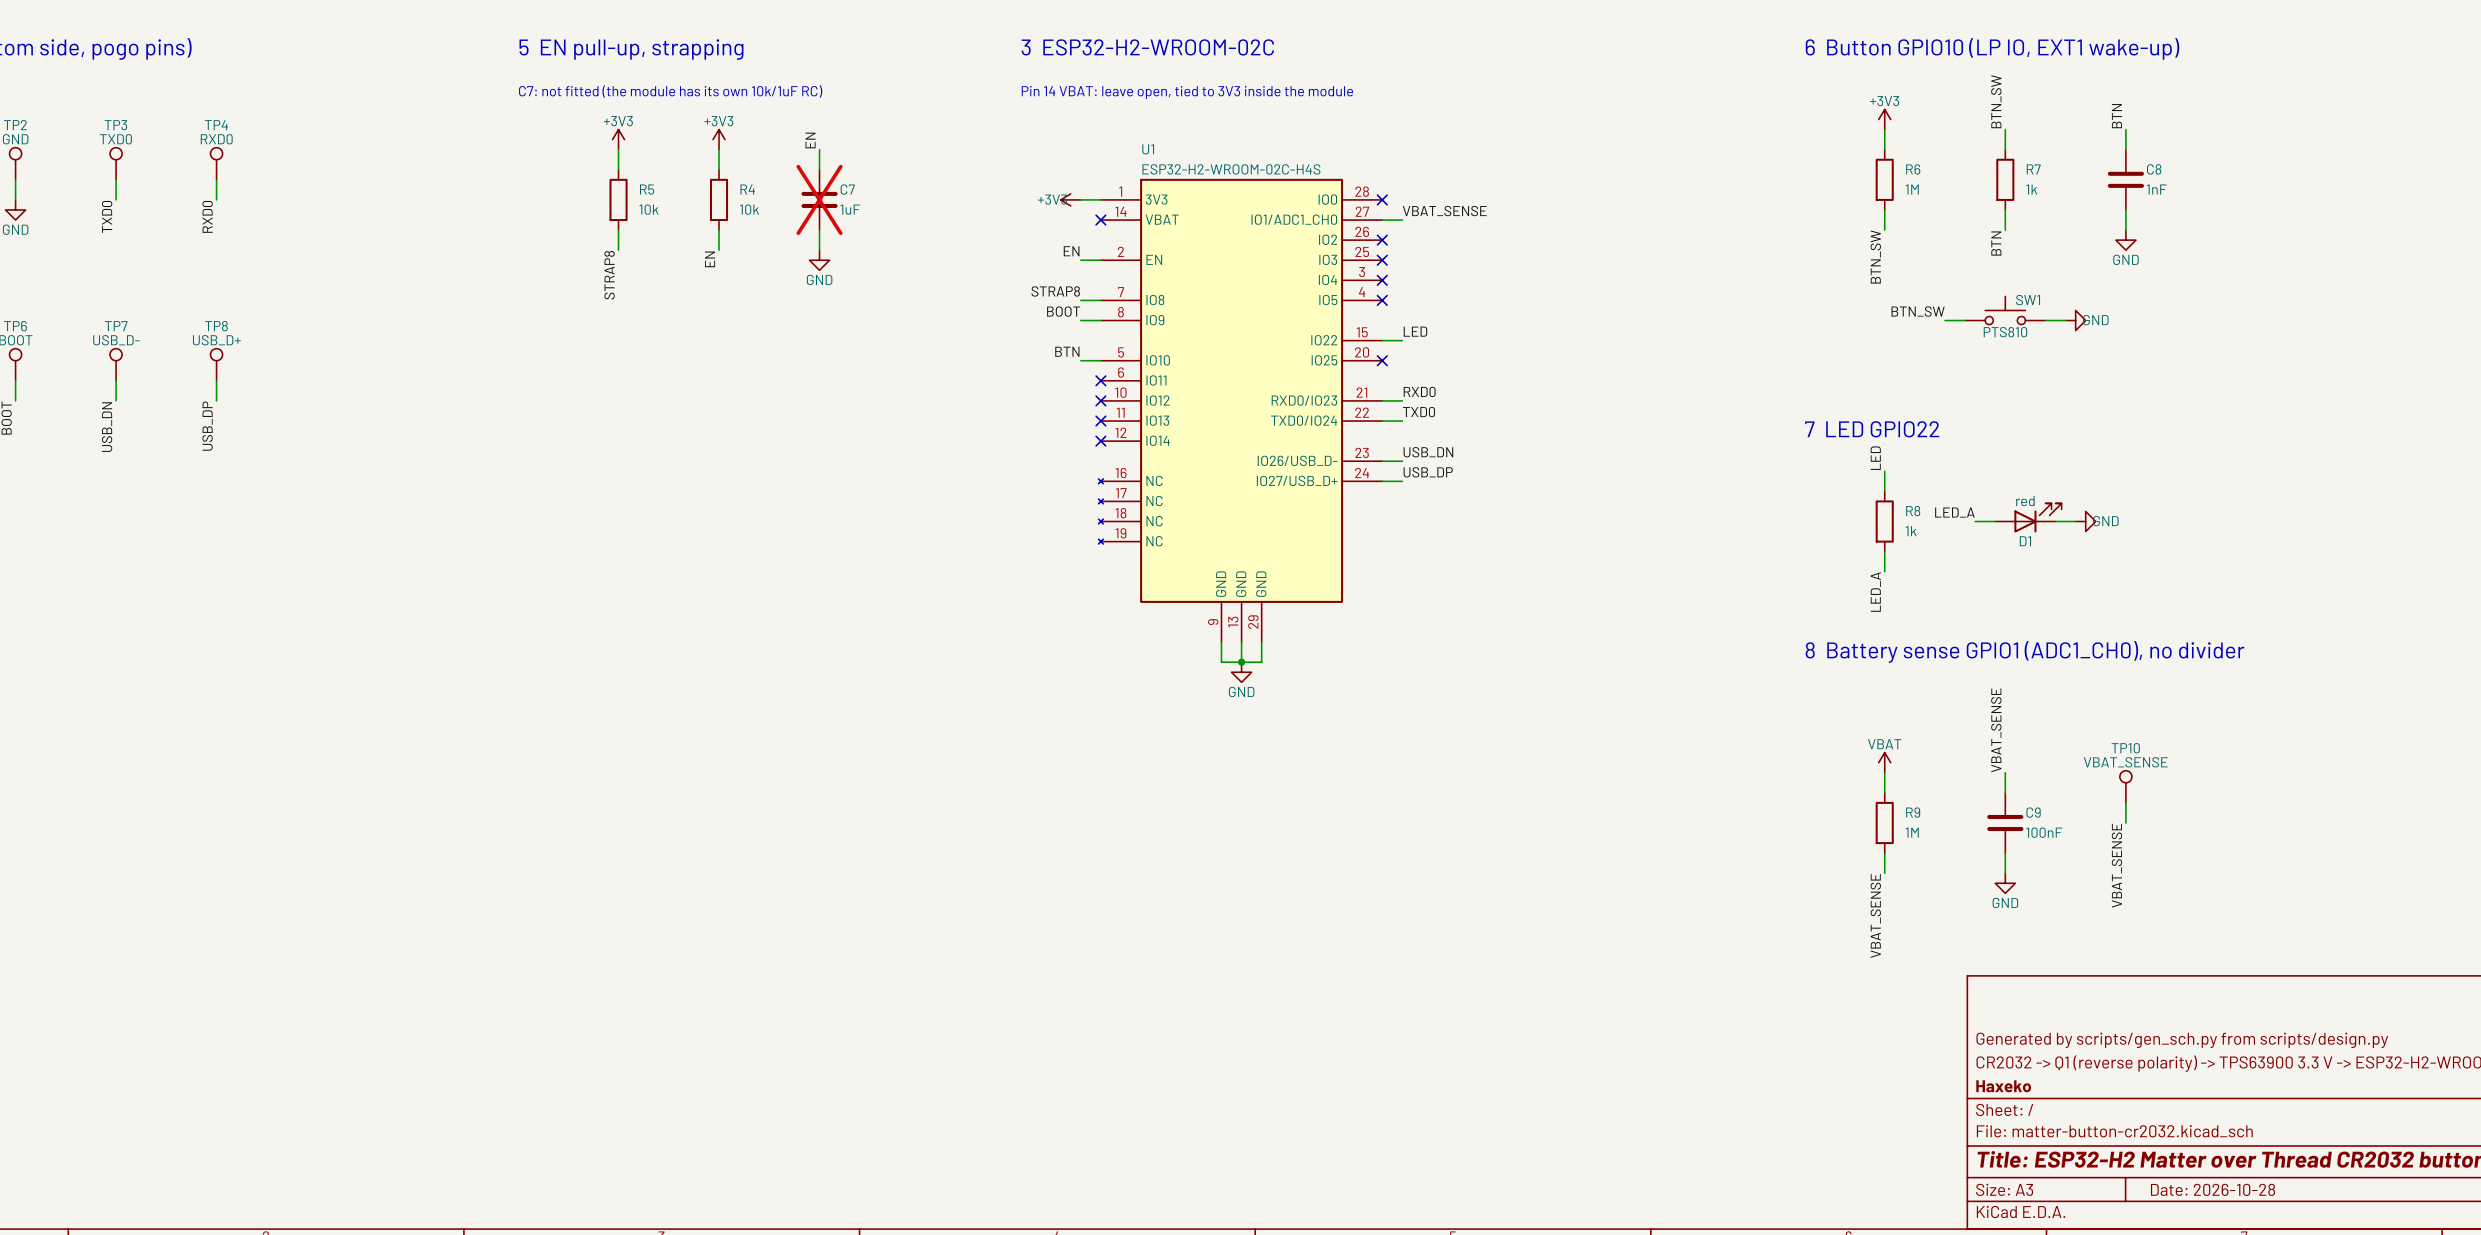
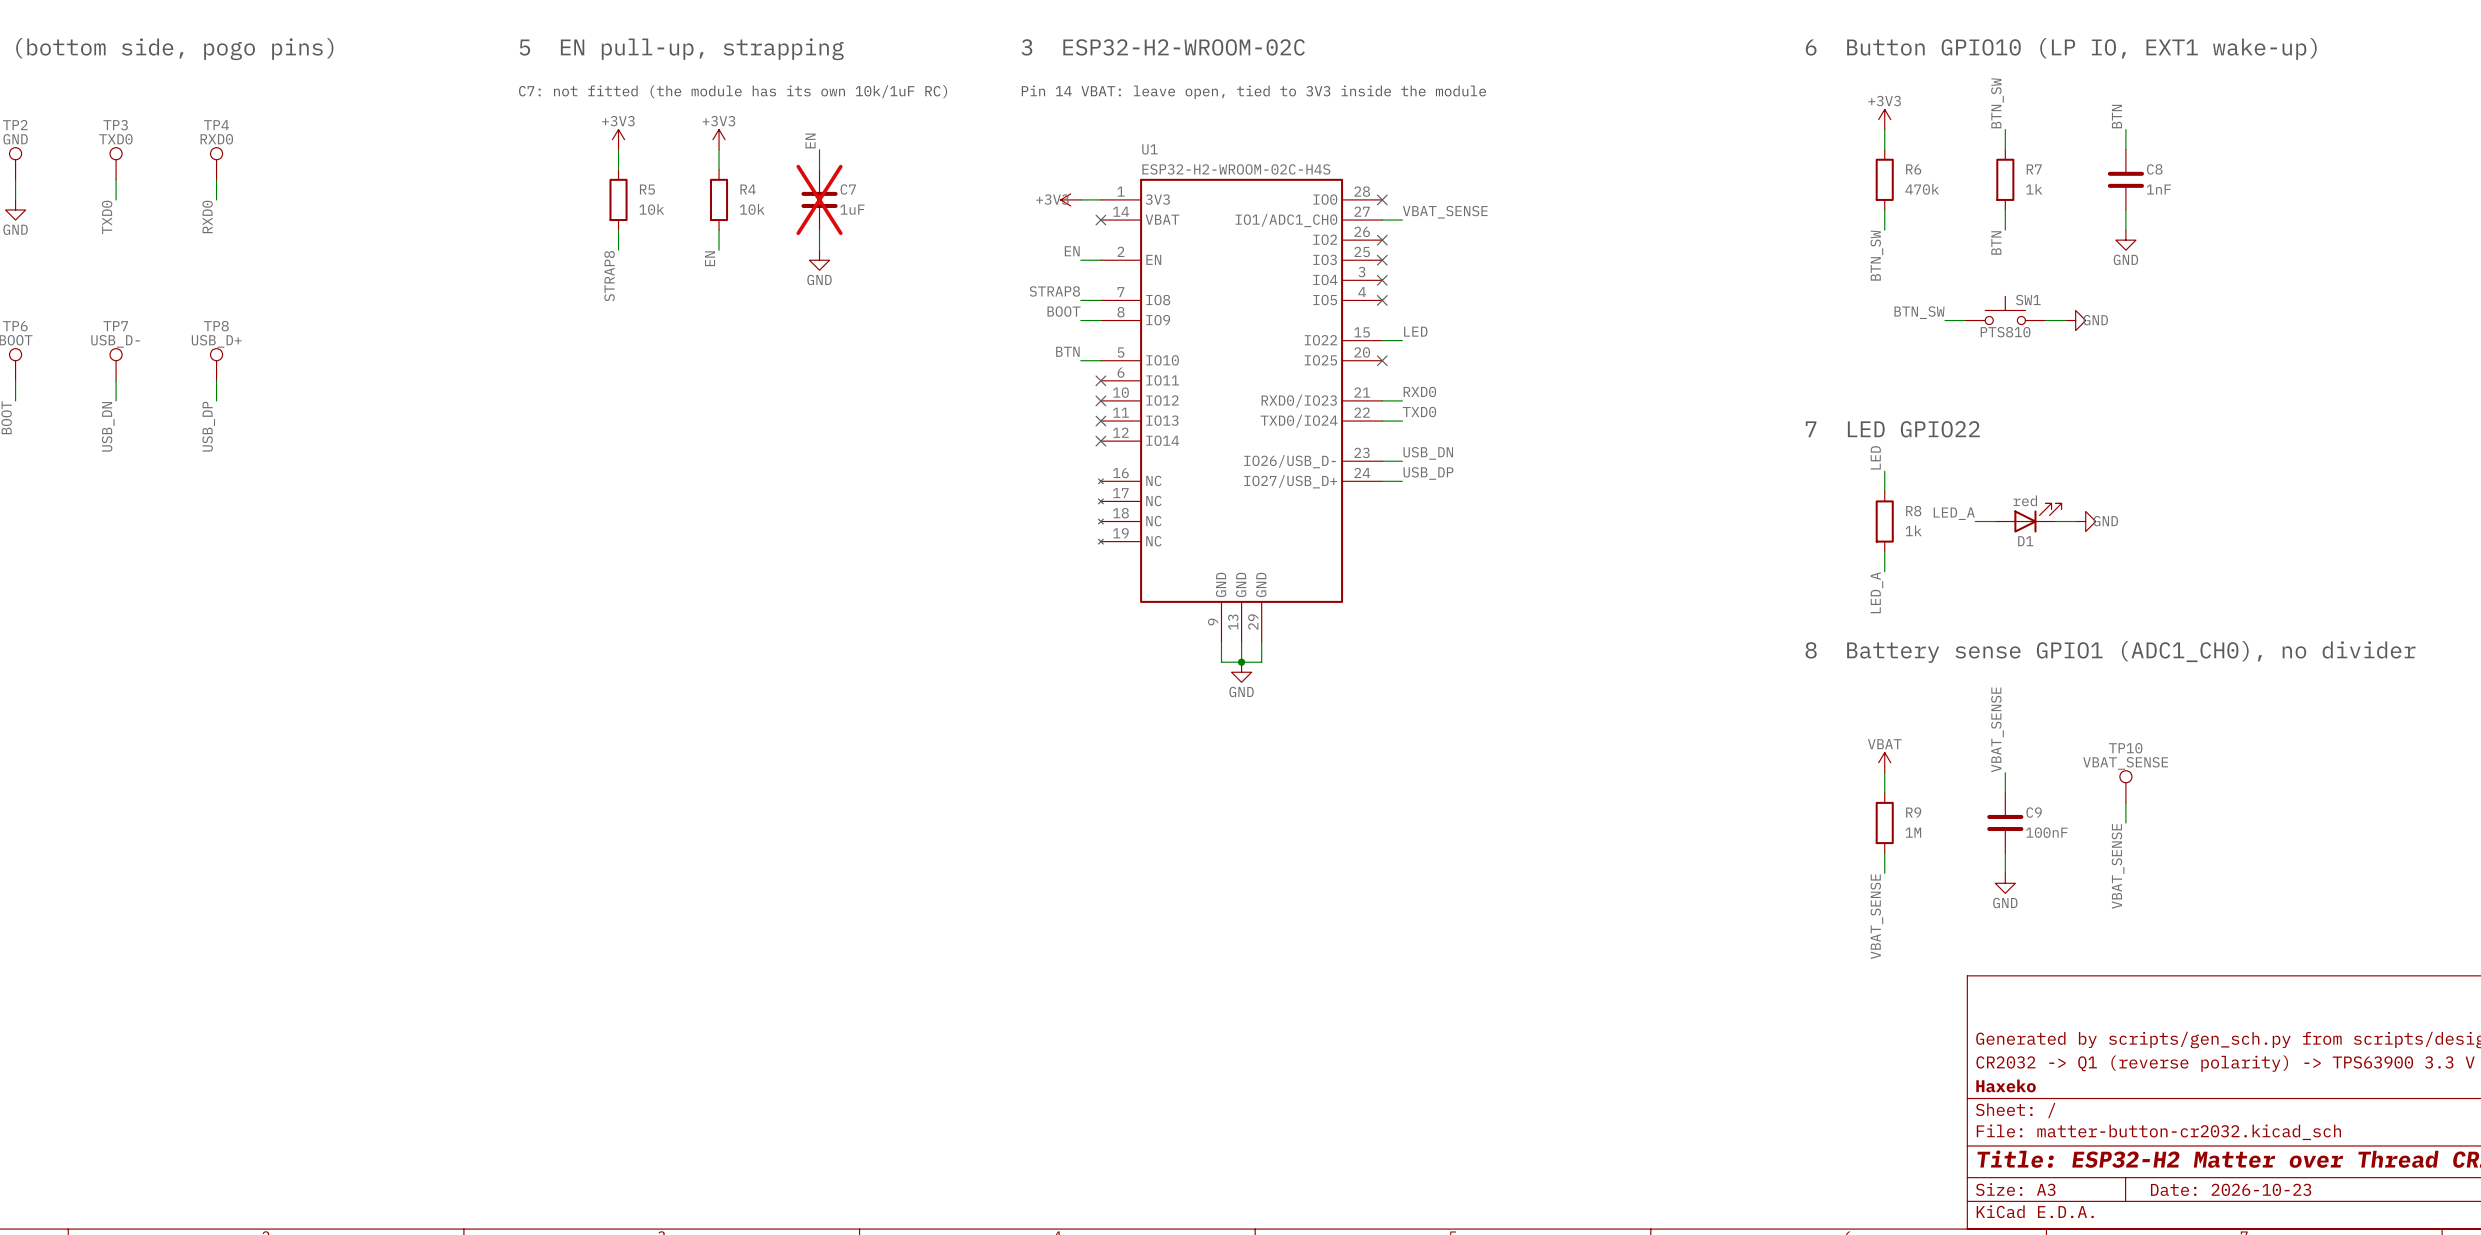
R6 value: 1M (1912, 189) -> 470k (1922, 189)
title block: Date: 2026-10-28 (2213, 1189) -> Date: 2026-10-23 (2231, 1189)

